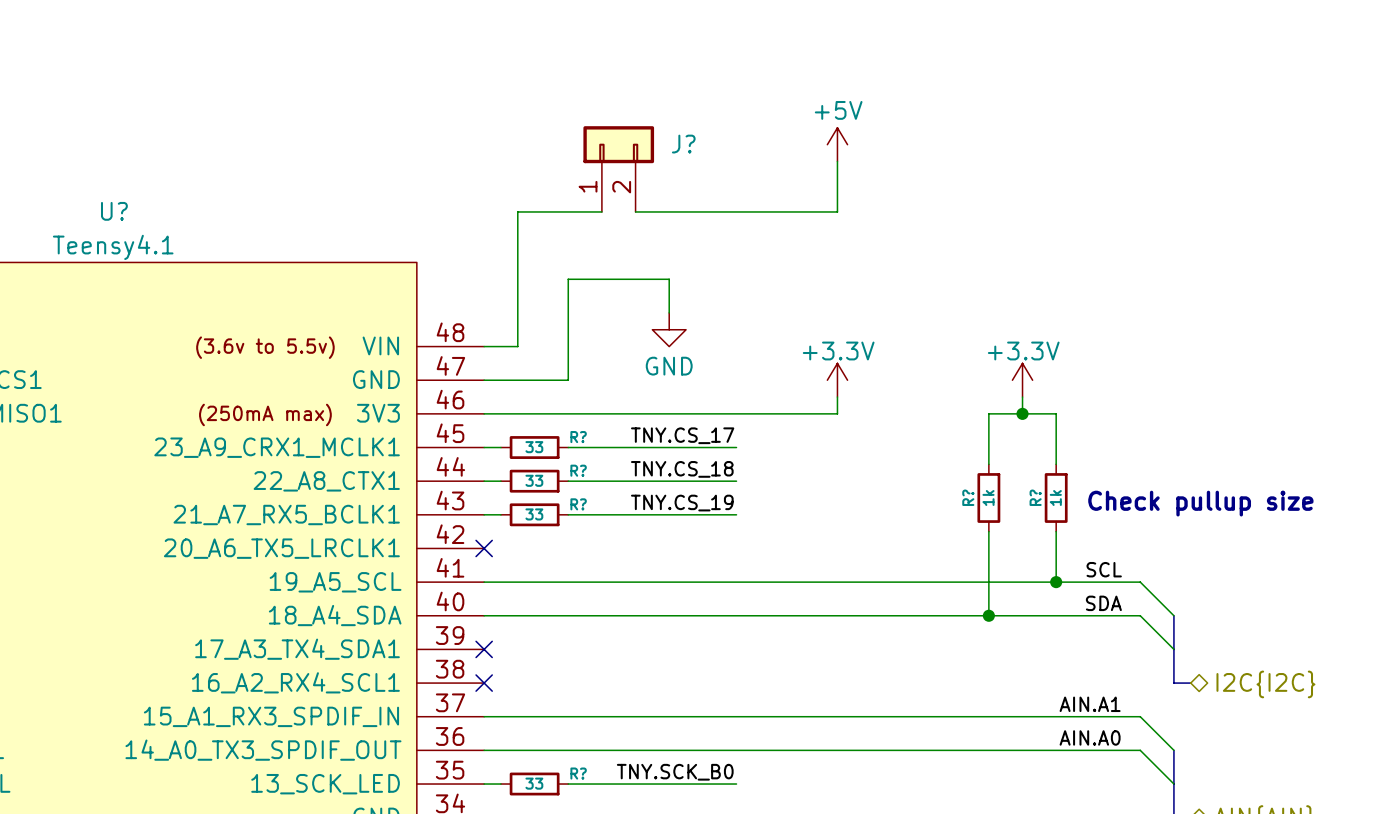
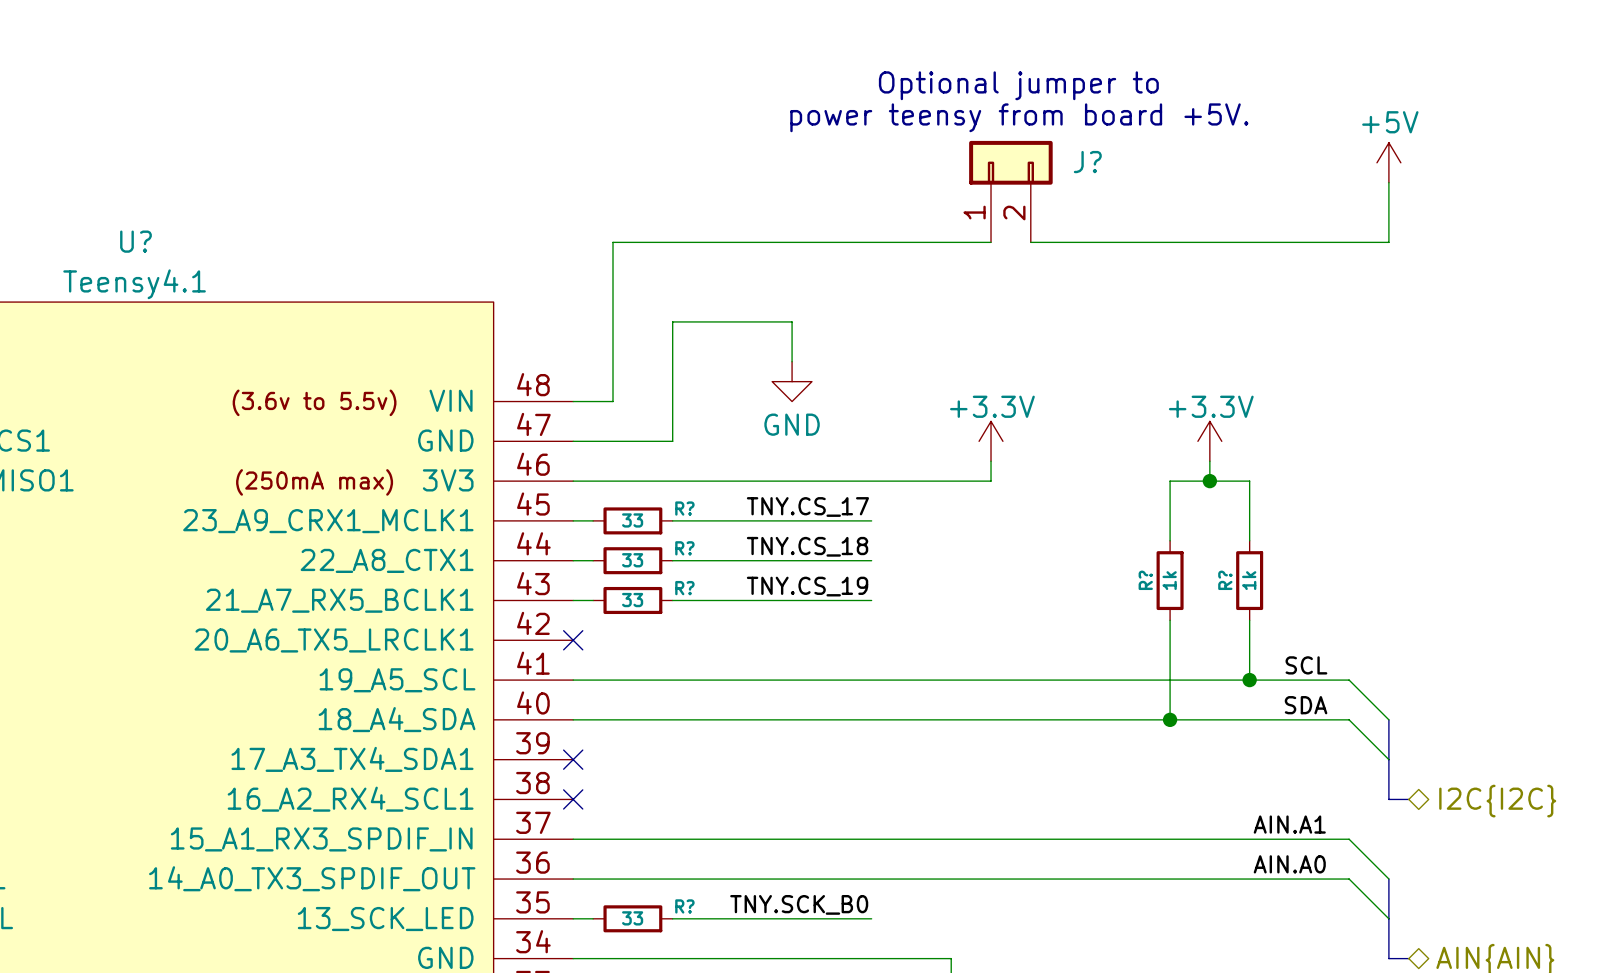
text: none -> Optional jumper to (1018, 85)
text: none -> power teensy from board +5V. (1019, 117)
power symbol: +5V (837, 144) -> none
power symbol: none -> +5V (1388, 162)
wire: none -> (1388, 182) (1388, 242) (1030, 242)
J? position: (618, 169) -> (1010, 191)
wire: none -> (712, 242) (752, 242)
text: Check pullup size (1200, 503) -> none

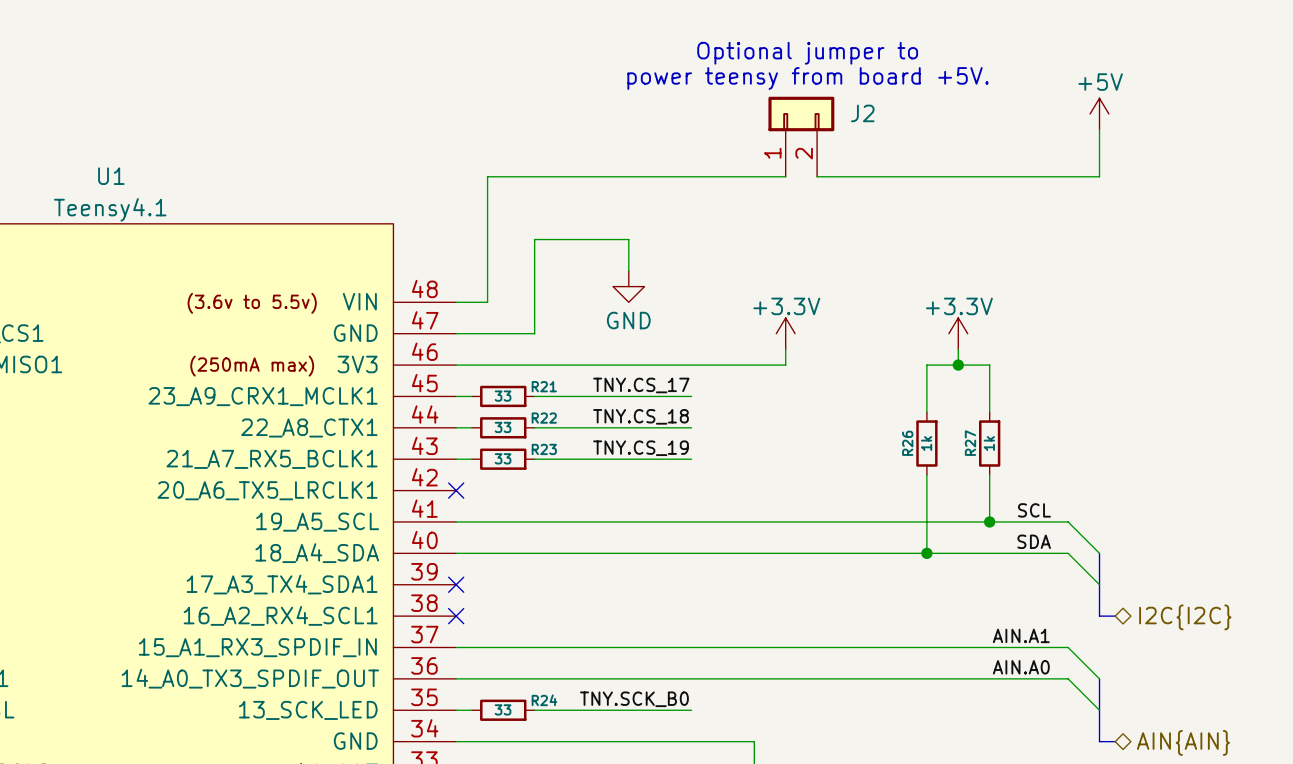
J? name: J? (1087, 162) -> J2 (862, 113)
U? name: U? (135, 241) -> U1 (111, 176)
R? name: R? (684, 508) -> R21 (544, 386)
R? name: R? (684, 548) -> R22 (544, 418)
R? name: R? (1145, 580) -> R26 (907, 443)
R? name: R? (1225, 580) -> R27 (970, 443)
R? name: R? (684, 588) -> R23 (544, 449)
R? name: R? (684, 906) -> R24 (544, 700)

